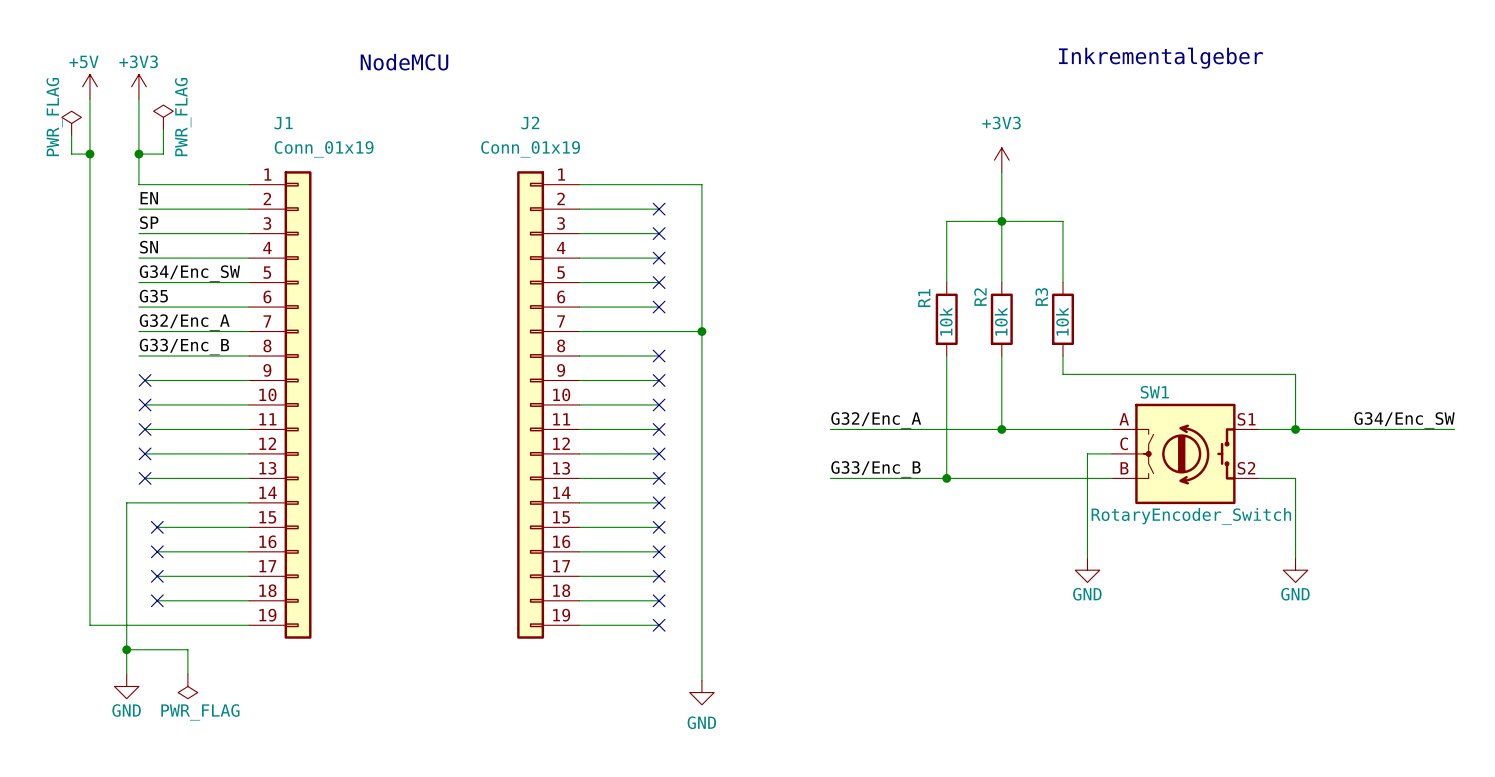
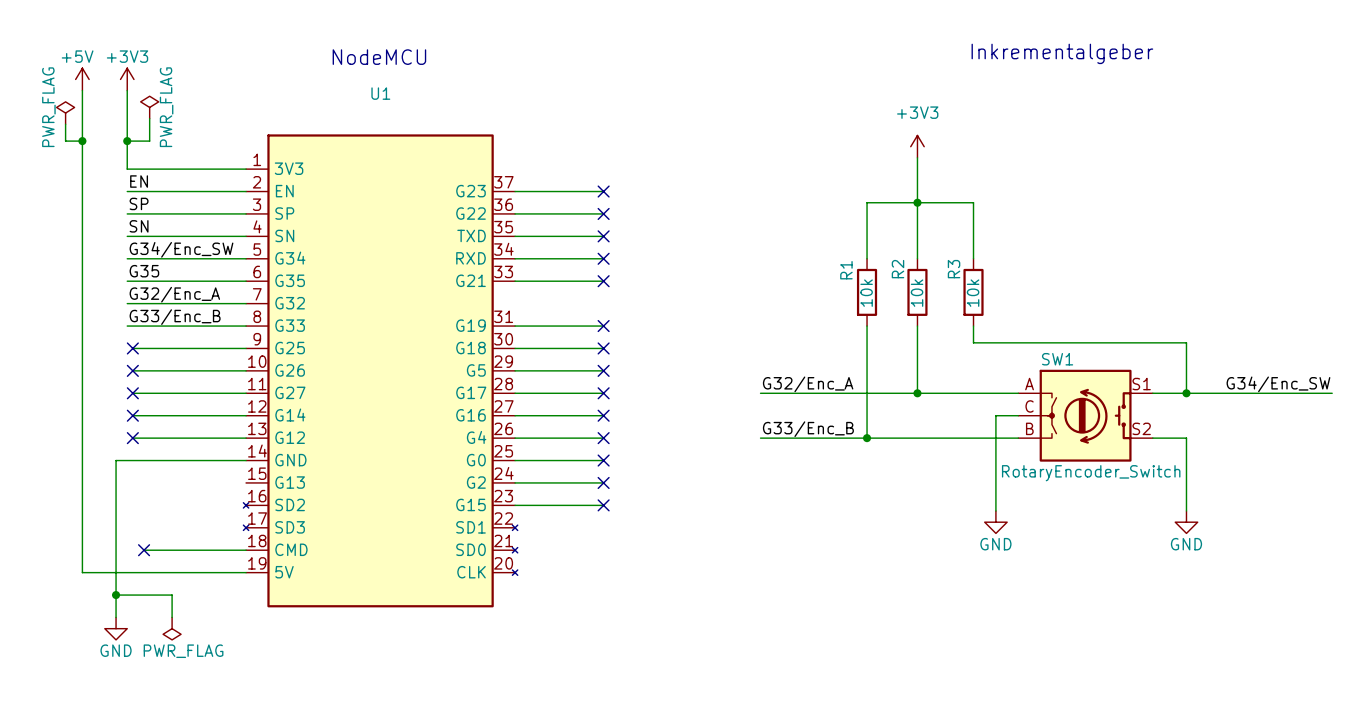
wire: (579, 184) (701, 184) (701, 680) -> none
wire: (579, 331) (701, 331) -> none
junction: (701, 331) -> none
J1: Conn_01x19 (280, 404) -> none
U1: none -> (380, 370)
J2: Conn_01x19 (548, 404) -> none
wire: (157, 527) (249, 527) -> none
no-connect mark: (157, 527) -> none
wire: (157, 551) (249, 551) -> none
no-connect mark: (157, 551) -> none
wire: (157, 576) (249, 576) -> none
no-connect mark: (157, 576) -> none
wire: (579, 576) (659, 576) -> none
no-connect mark: (659, 576) -> none
wire: (579, 600) (659, 600) -> none
no-connect mark: (659, 600) -> none
wire: (579, 625) (659, 625) -> none
no-connect mark: (659, 625) -> none
power symbol: GND (701, 692) -> none

